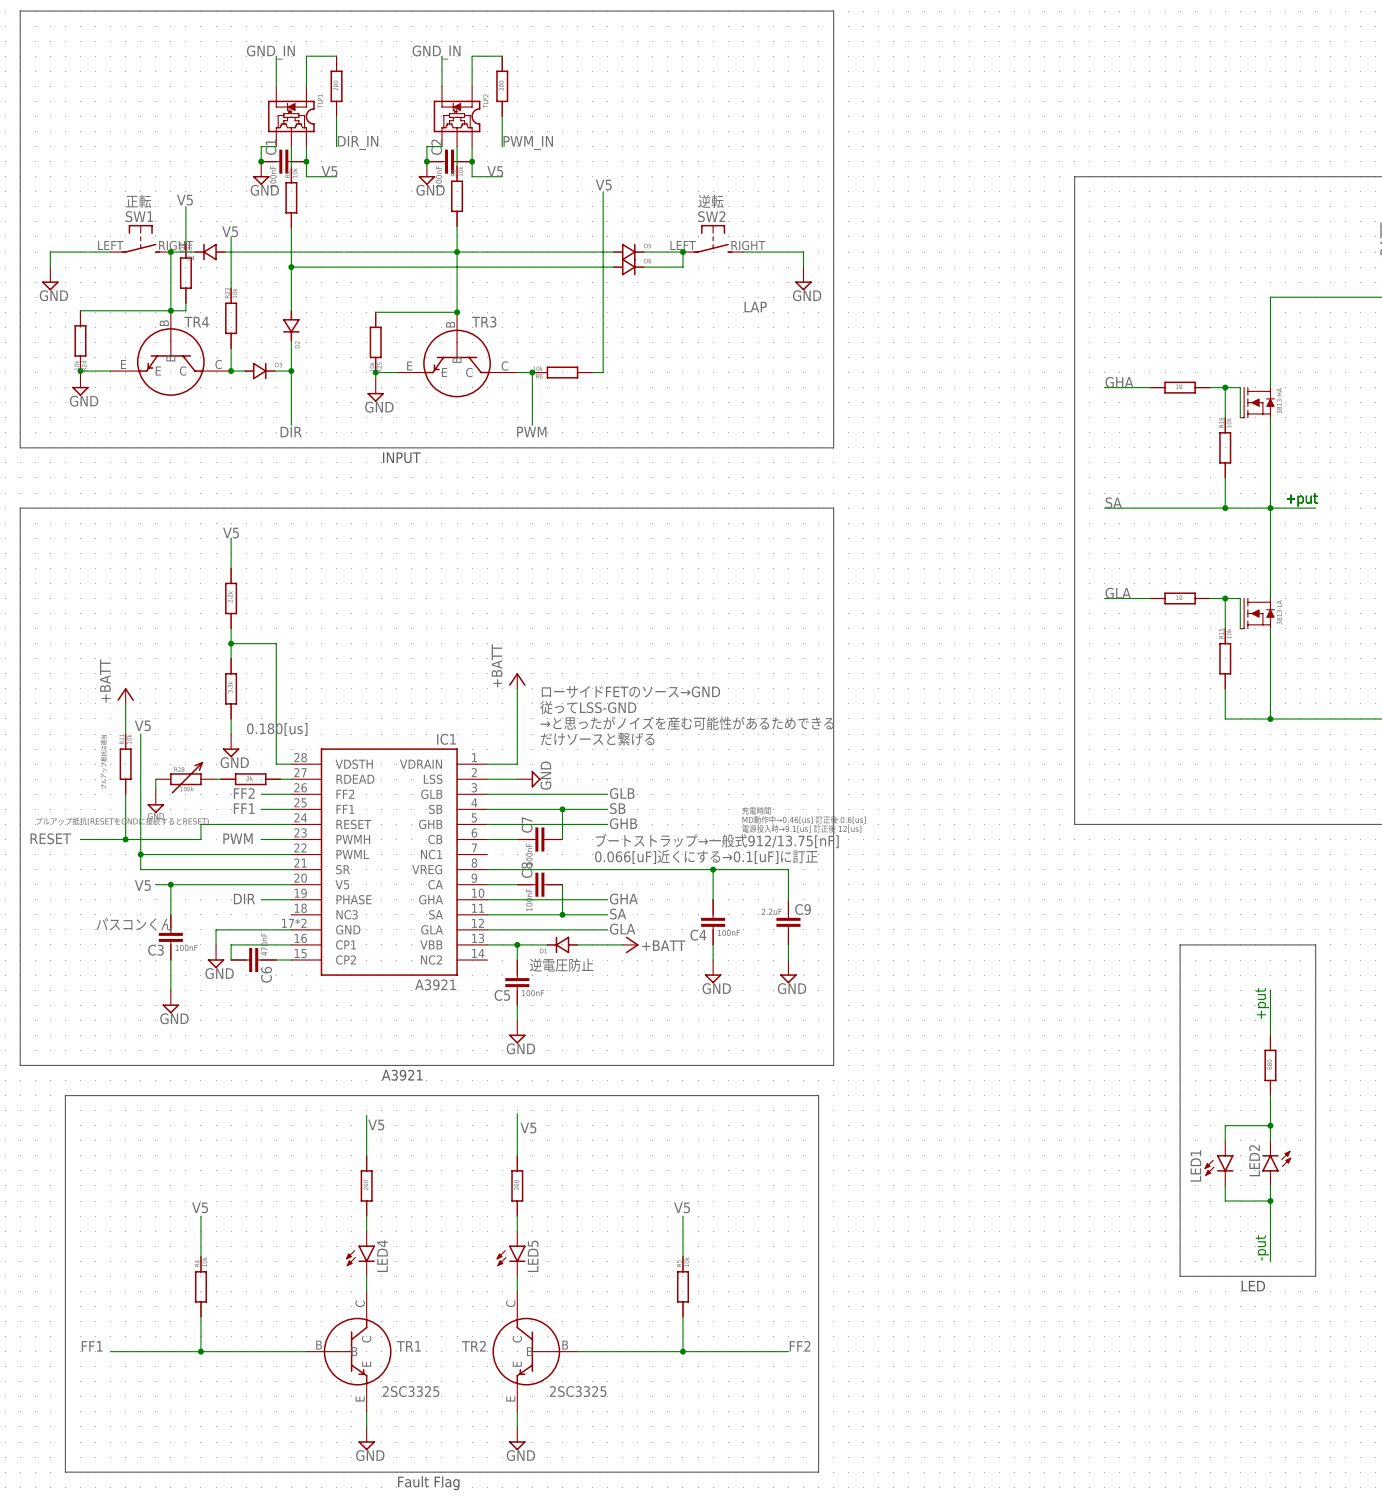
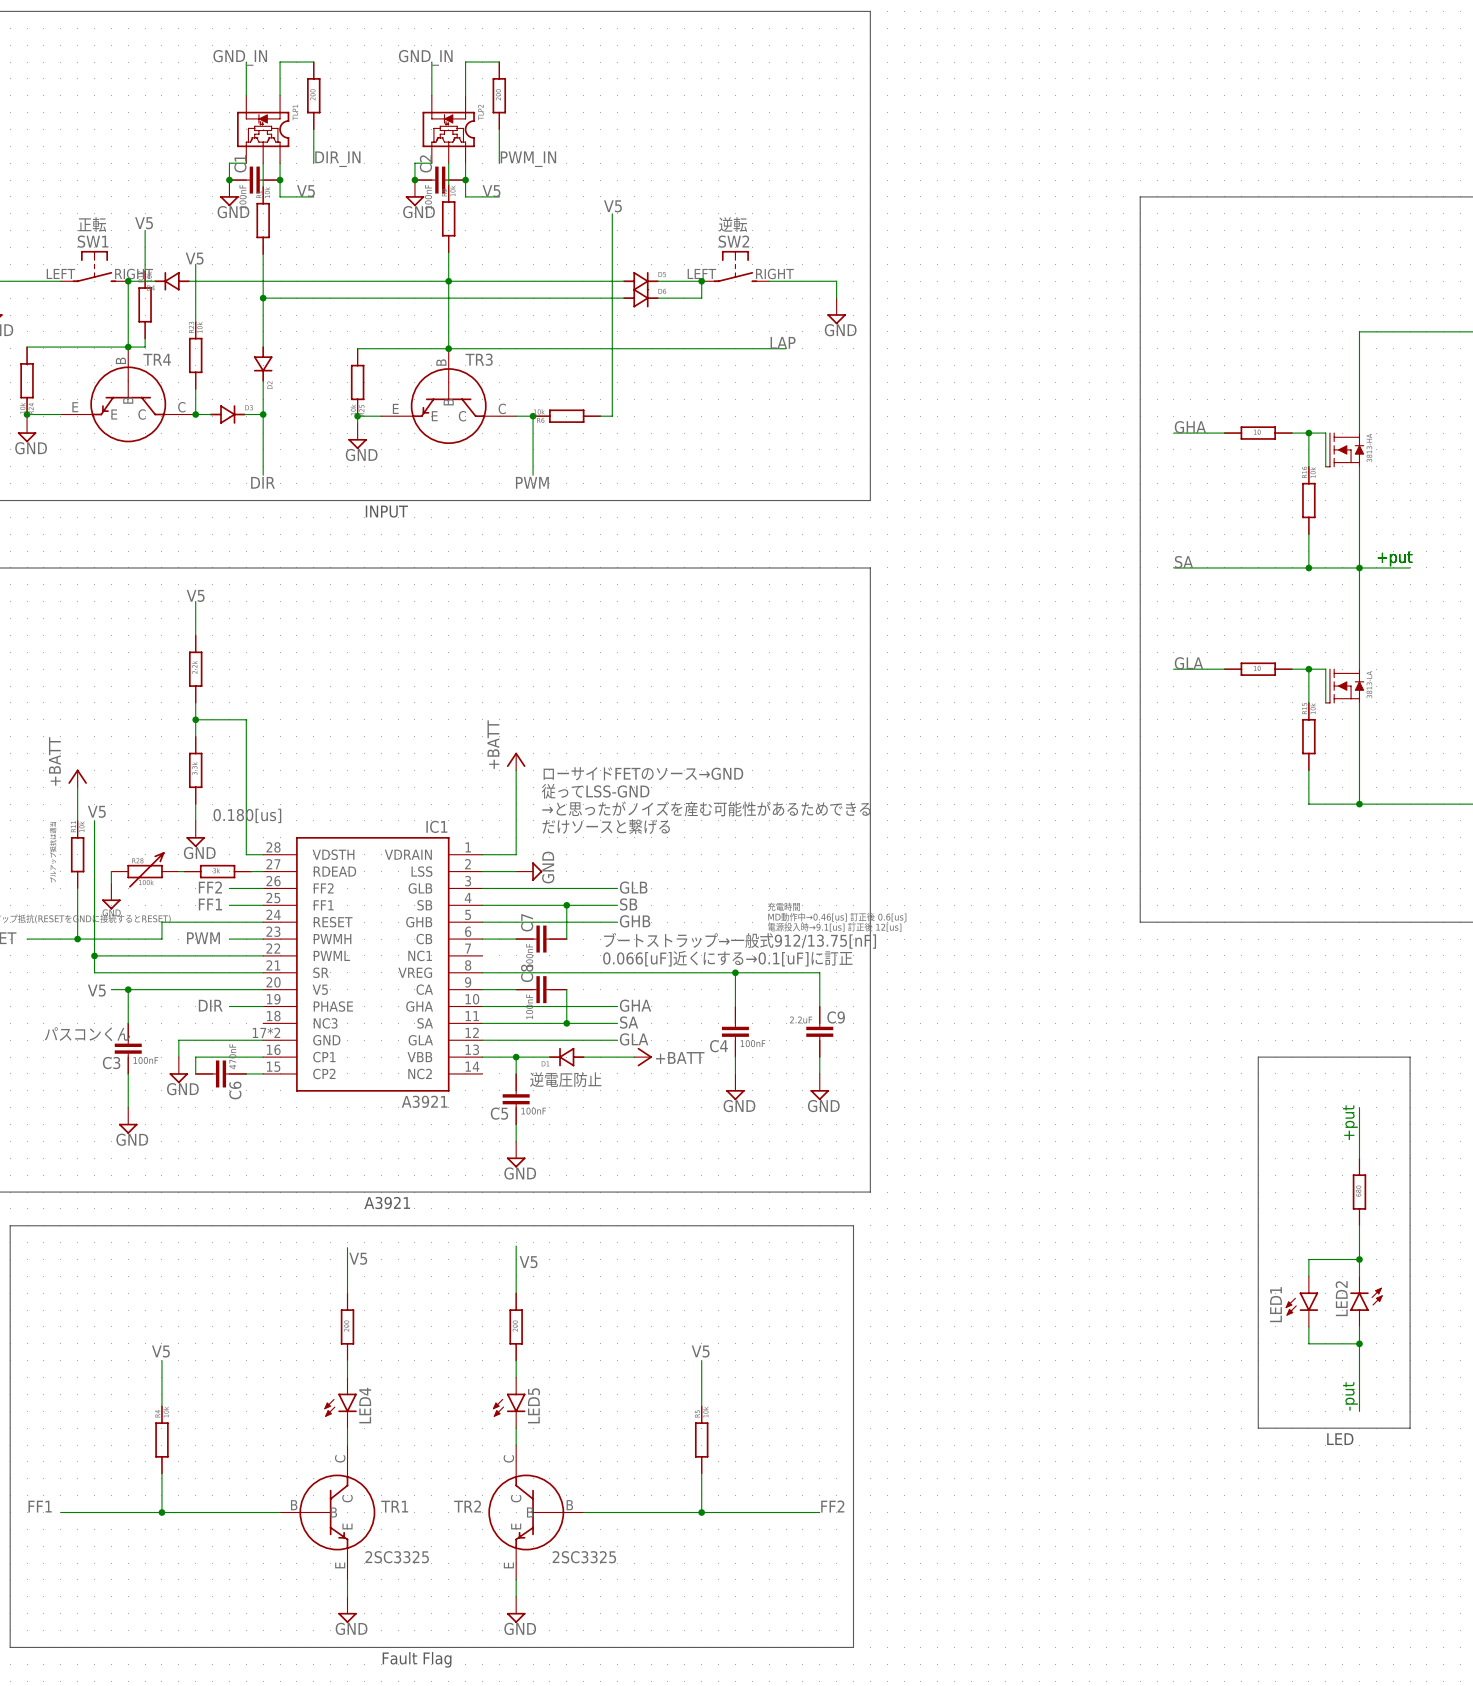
wire: none -> (448, 348) (786, 348)

